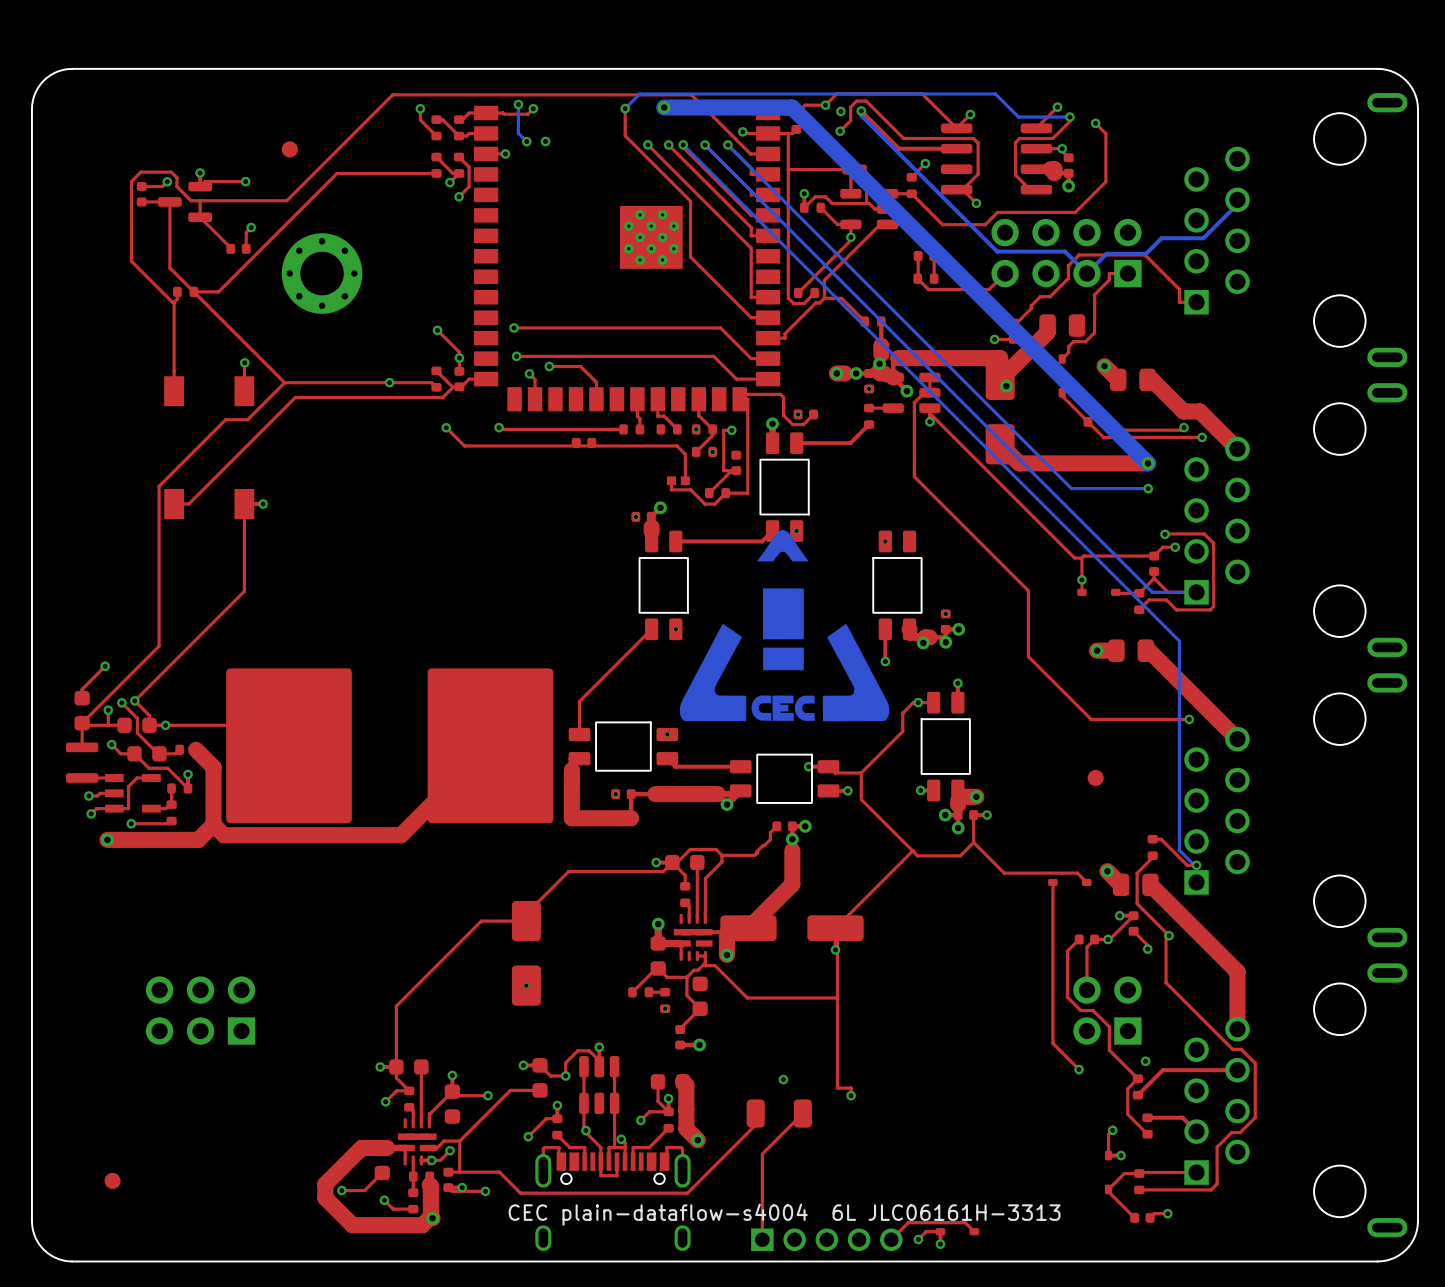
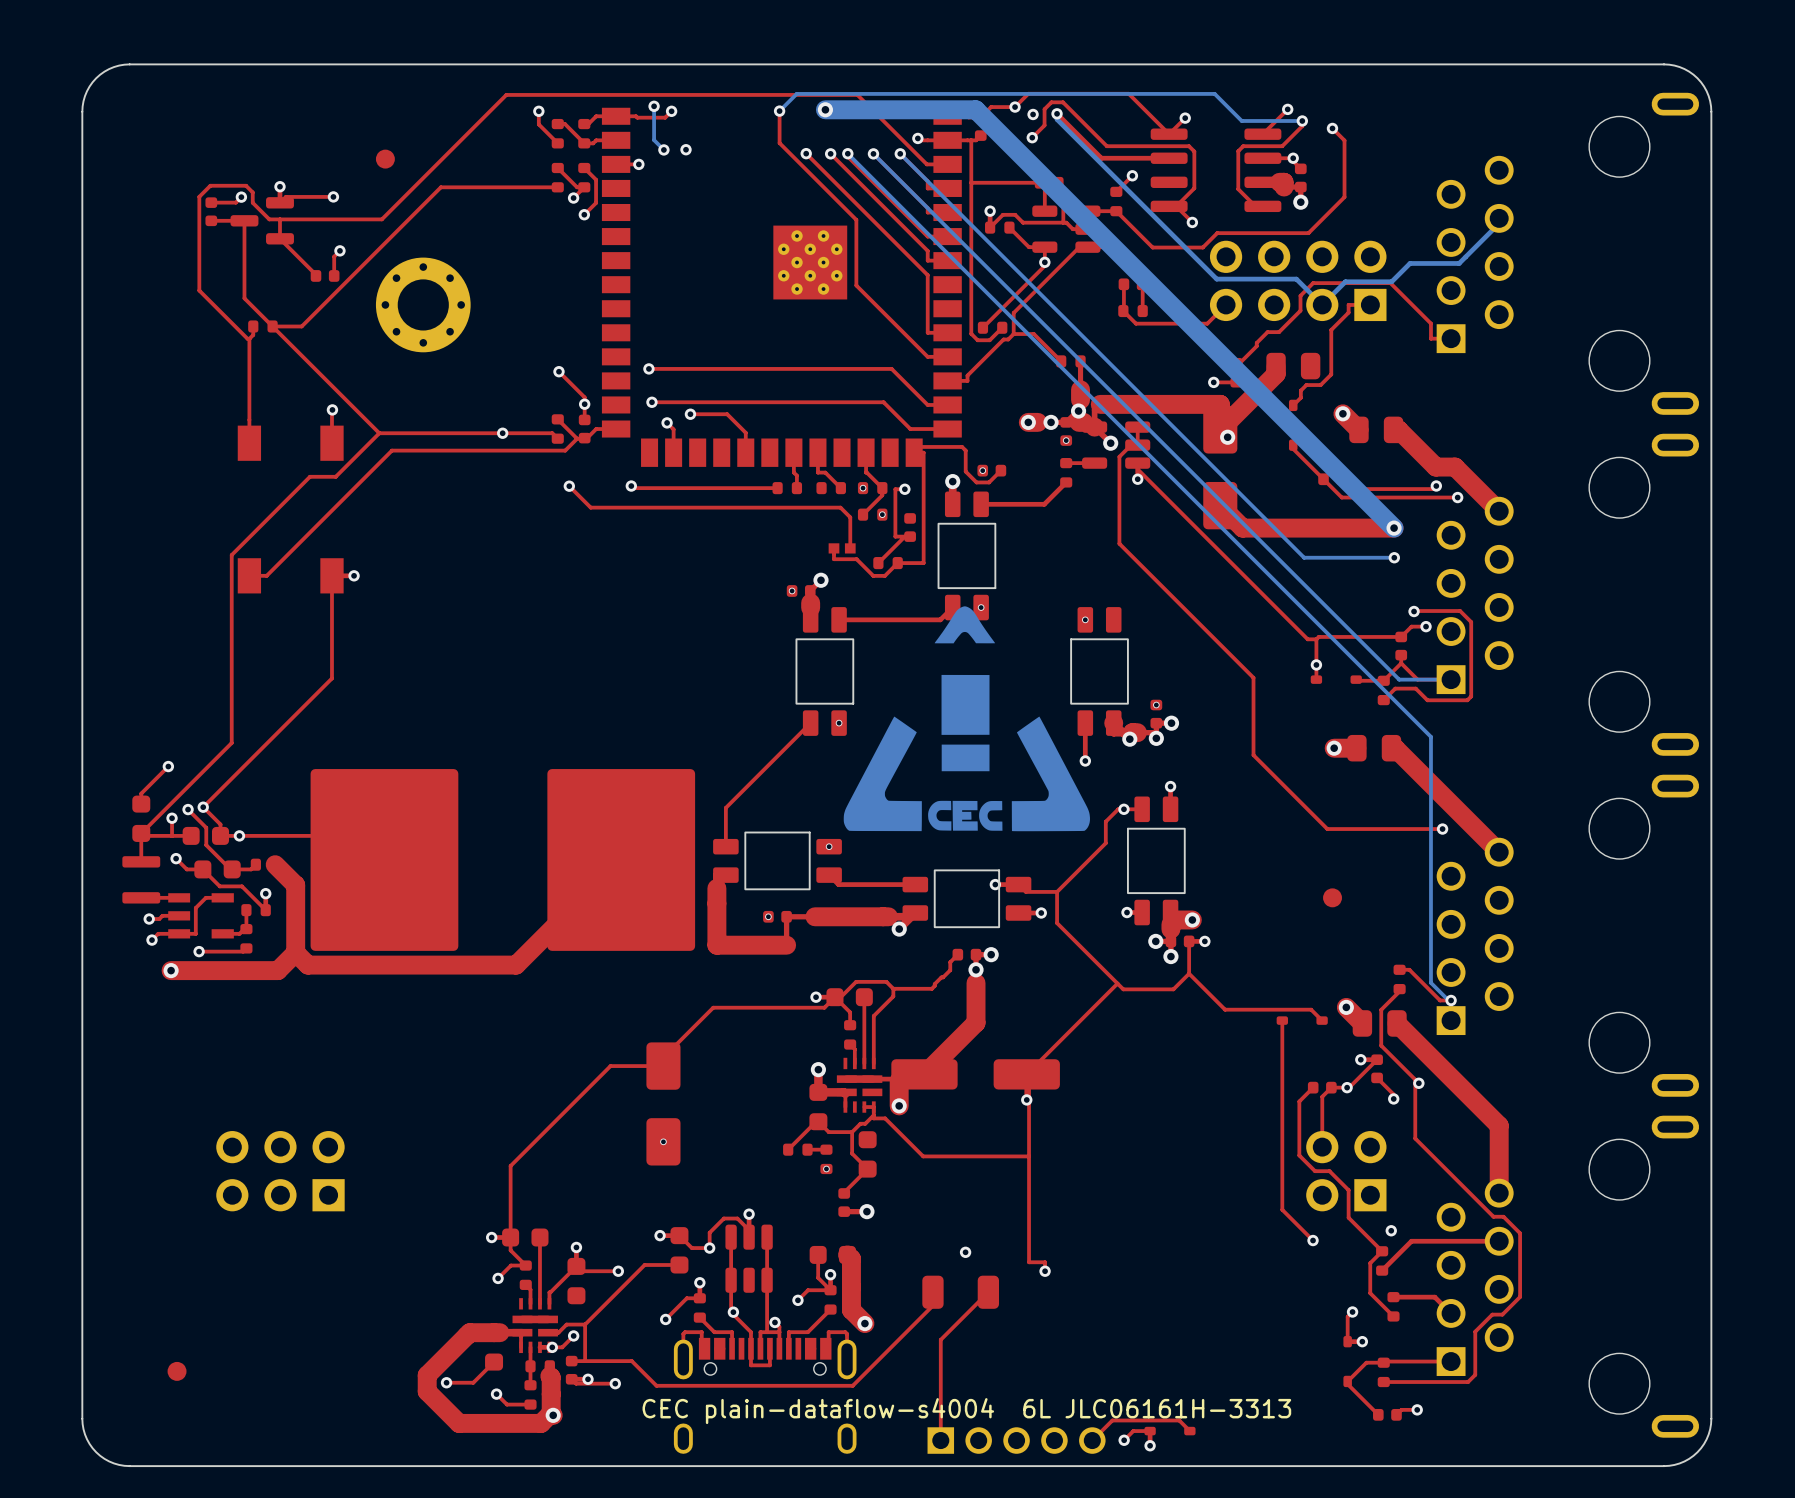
part: (584, 442) -> none

